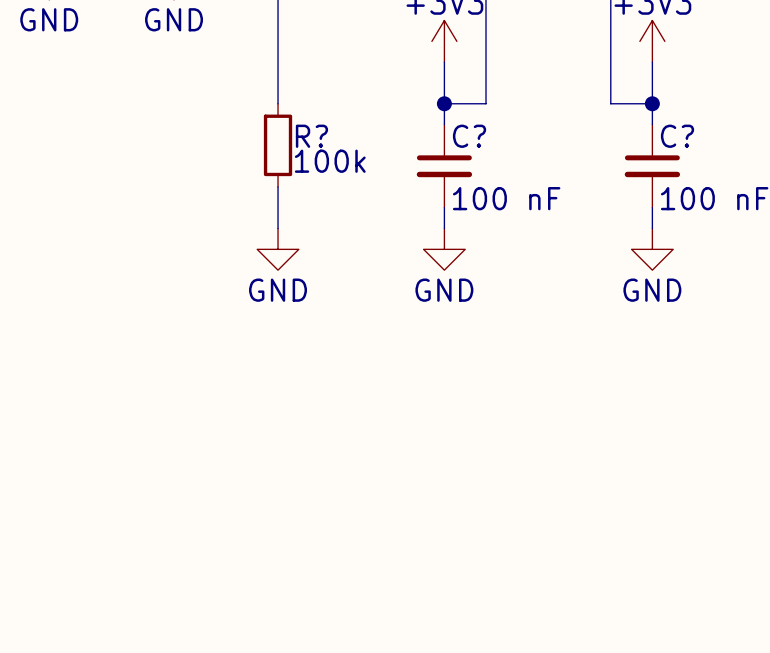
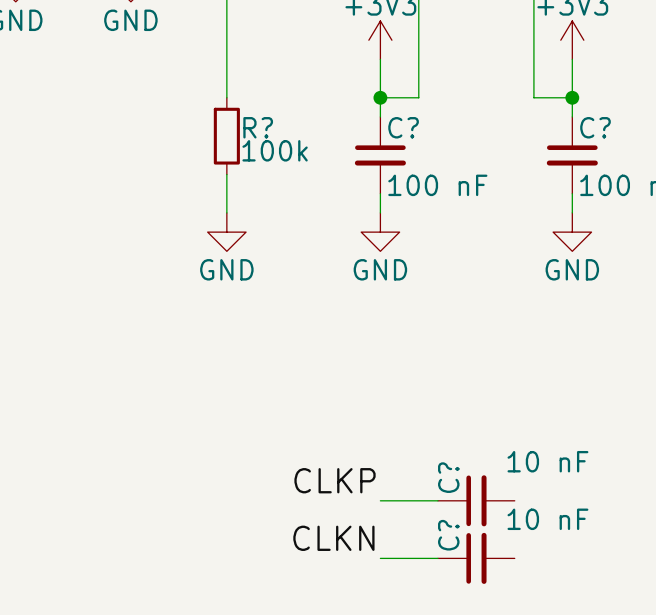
label: none -> CLKP (335, 480)
wire: none -> (380, 500) (437, 500)
C?: none -> 10 nF (476, 500)
label: none -> CLKN (333, 538)
wire: none -> (380, 558) (437, 558)
C?: none -> 10 nF (476, 558)

